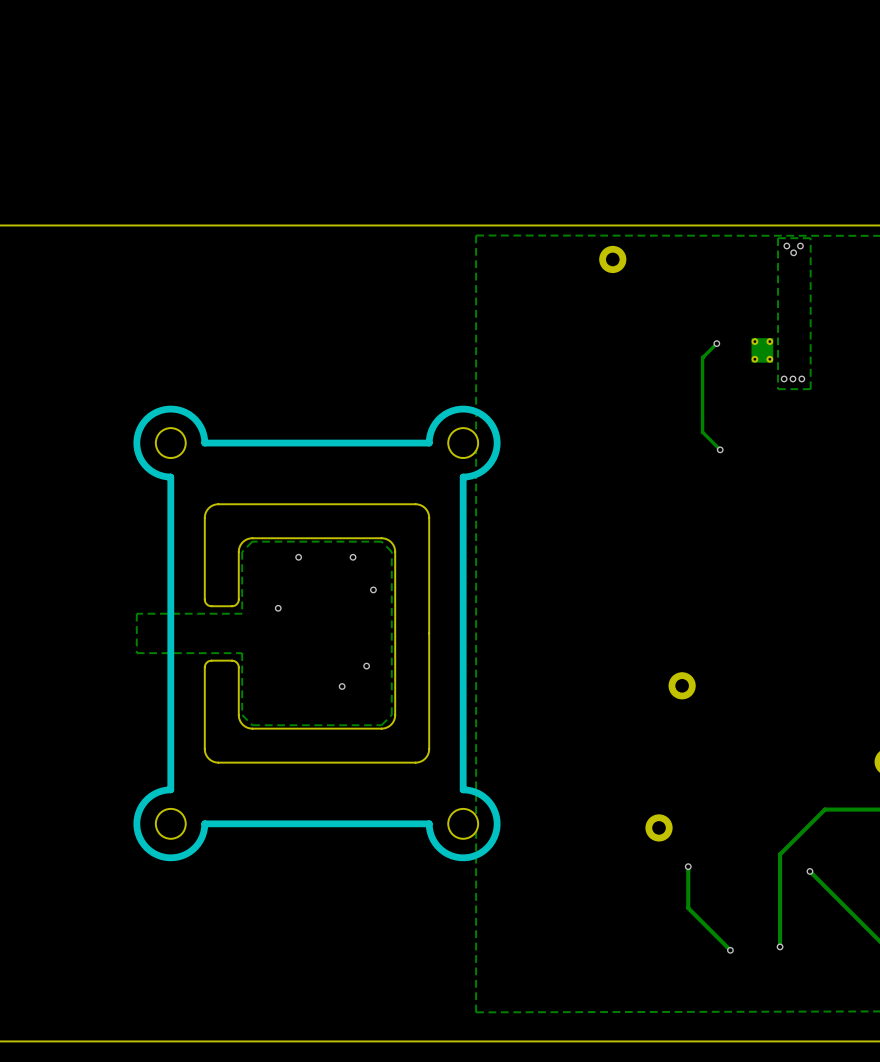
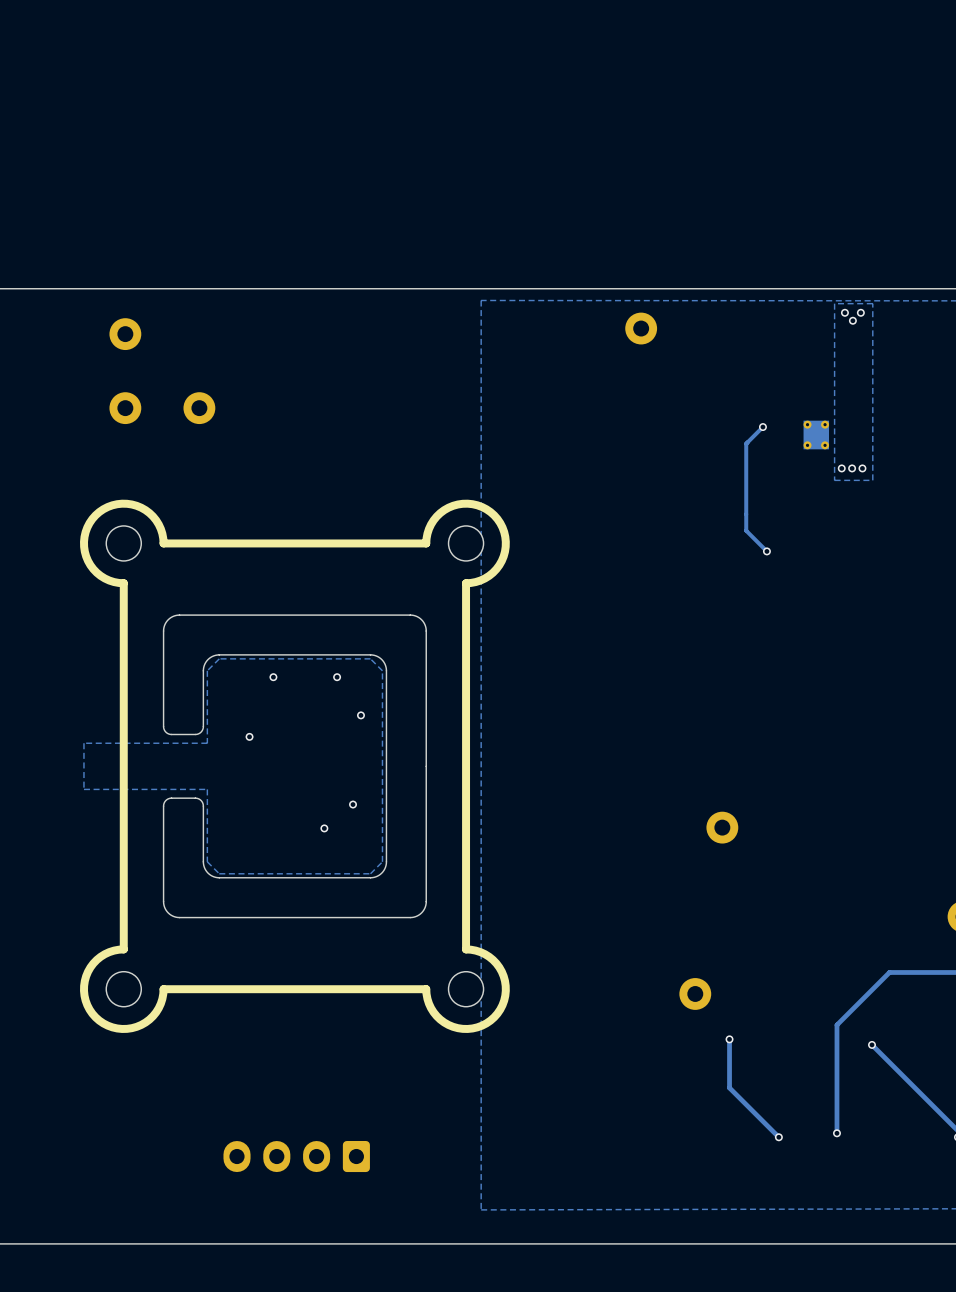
part: none -> (125, 334)
part: none -> (125, 408)
part: none -> (199, 408)
part: none -> (296, 1156)

